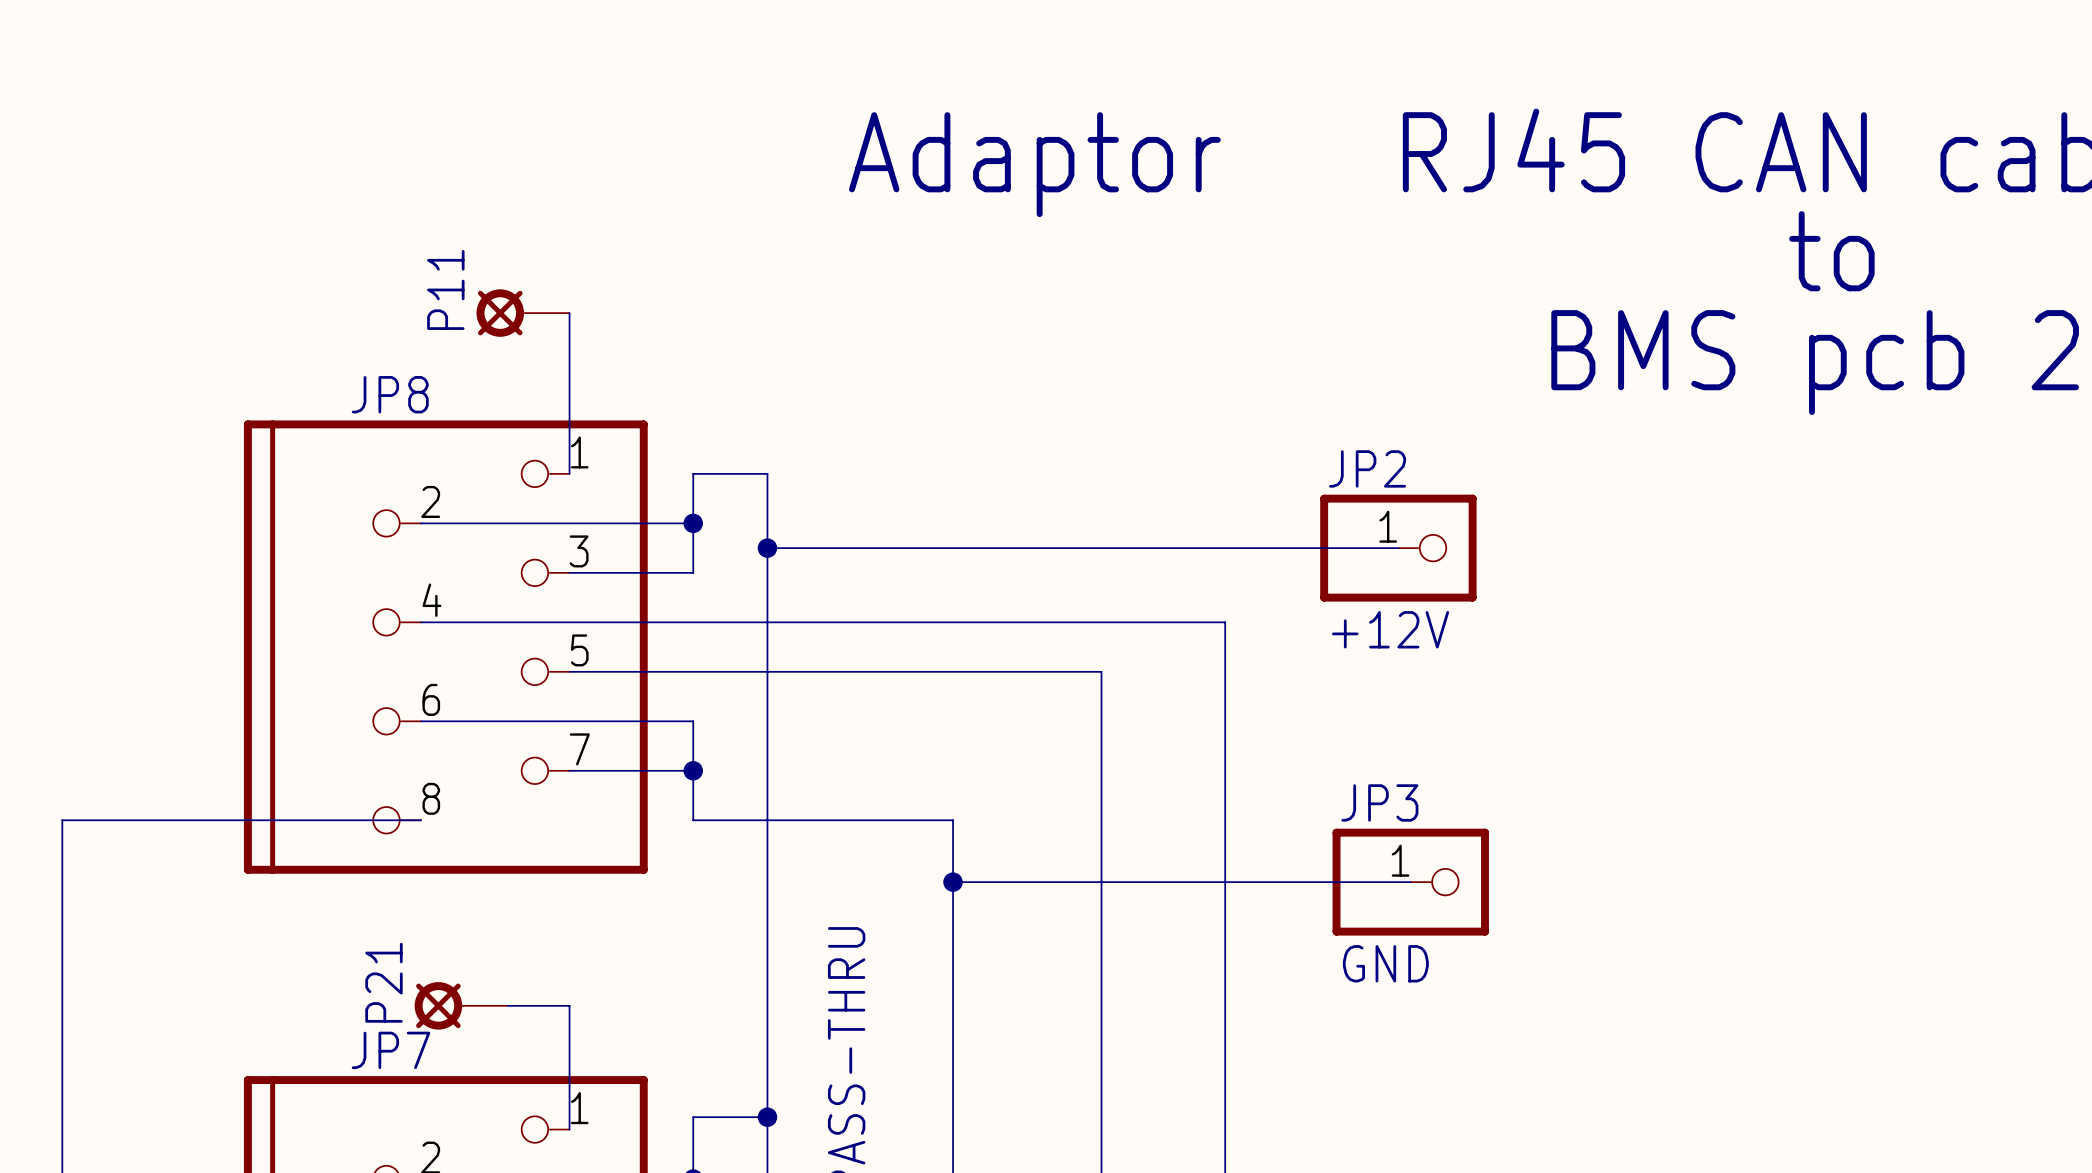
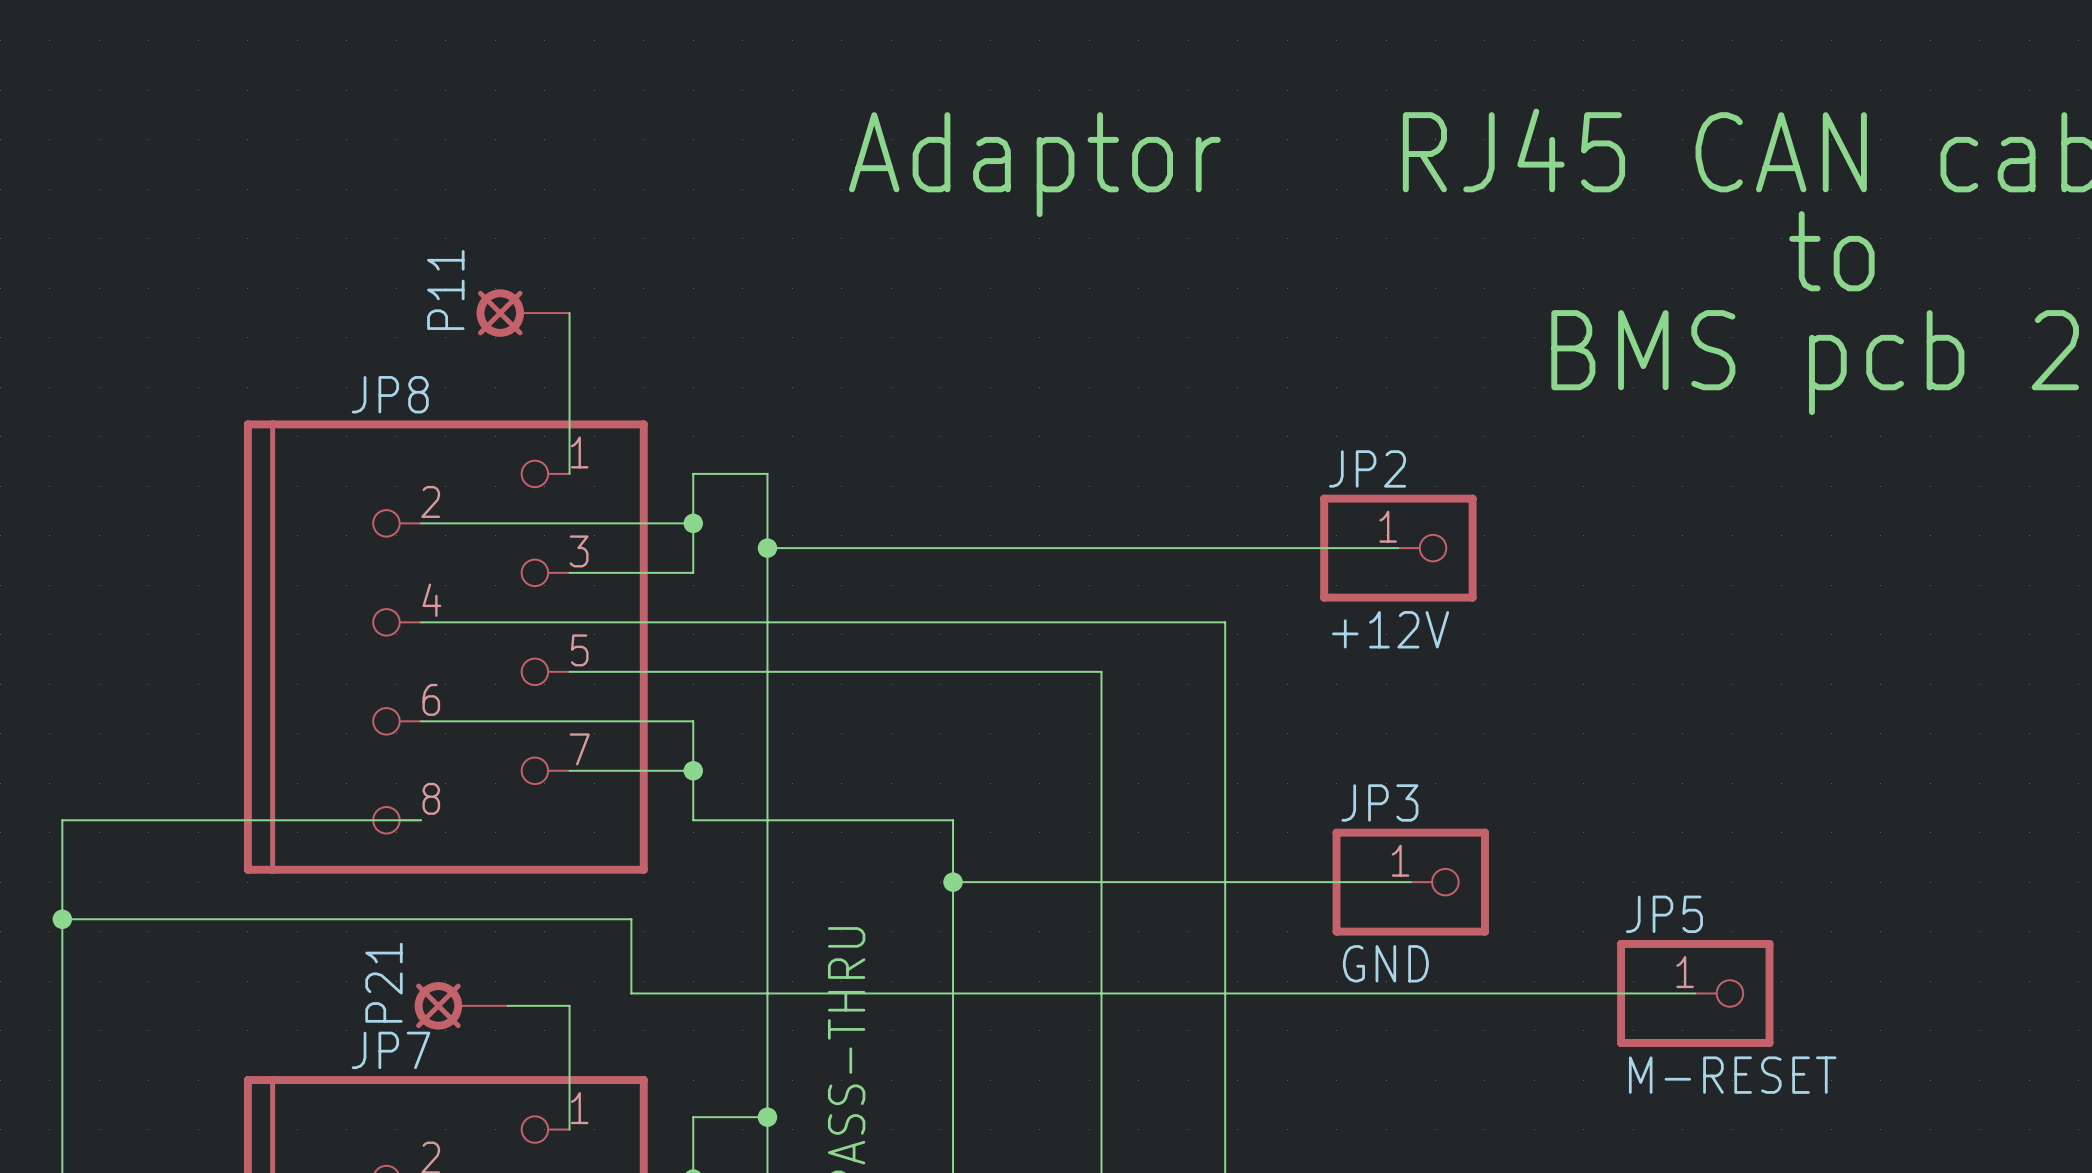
wire: none -> (62, 919) (631, 919) (631, 993) (1695, 993)
junction: none -> (62, 919)
JP5: none -> M-RESET (1695, 993)

